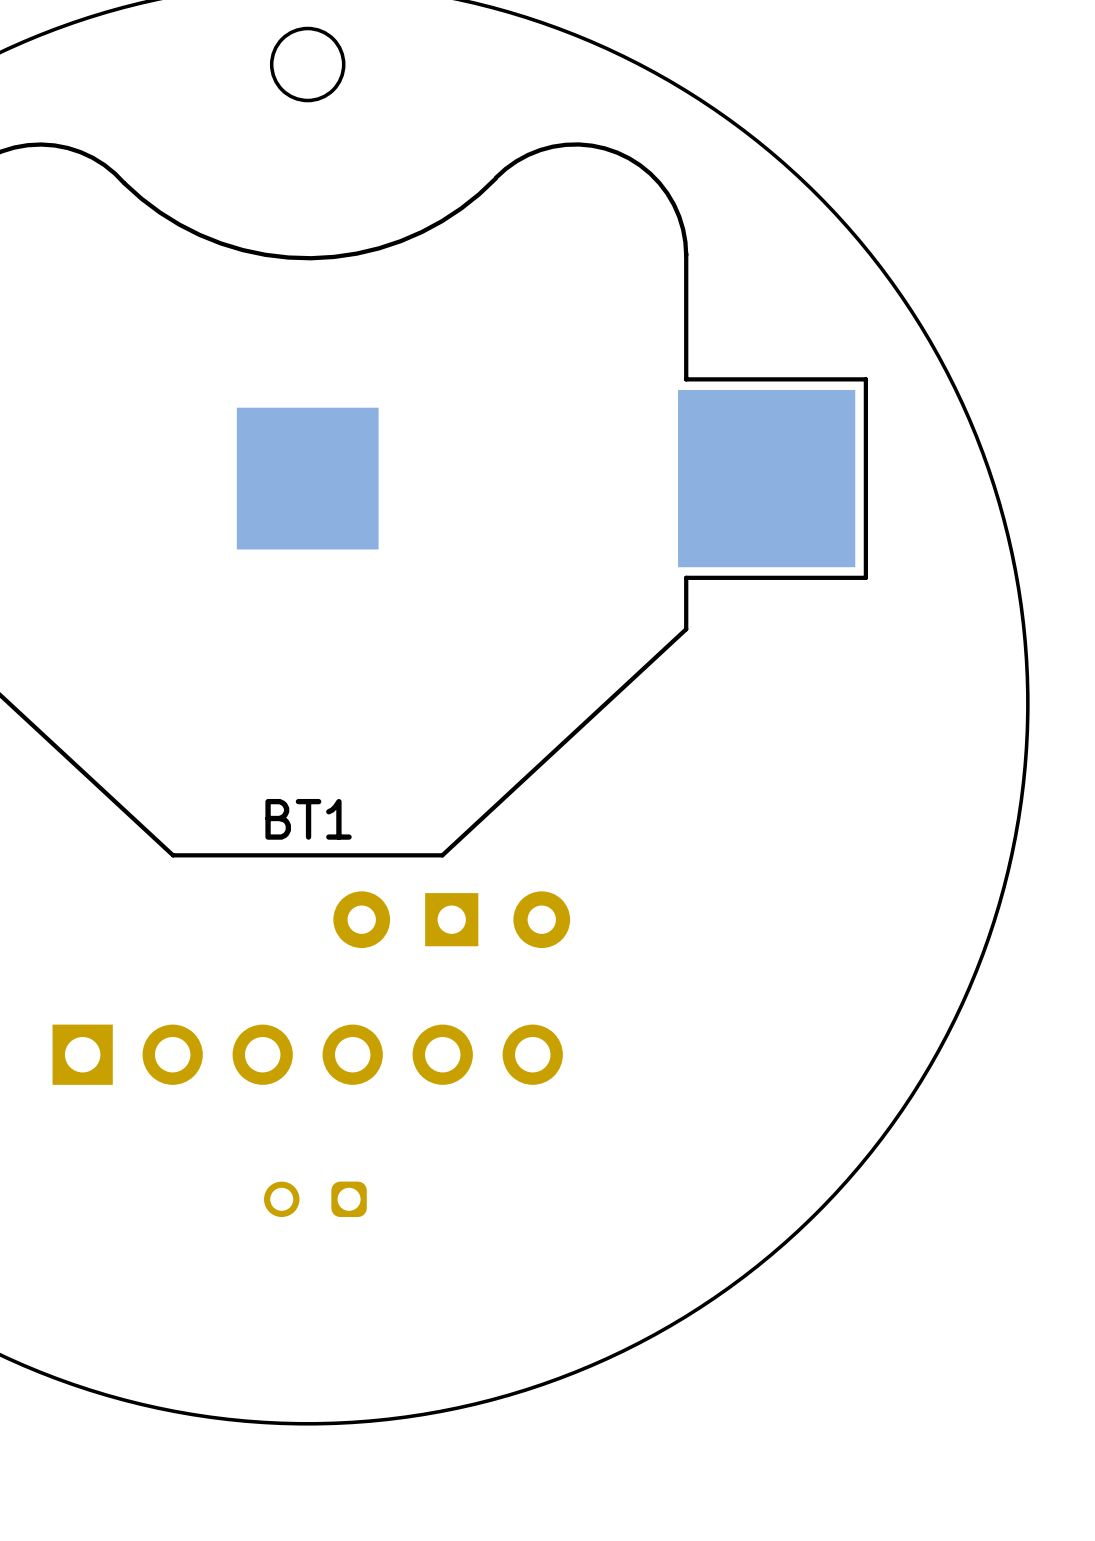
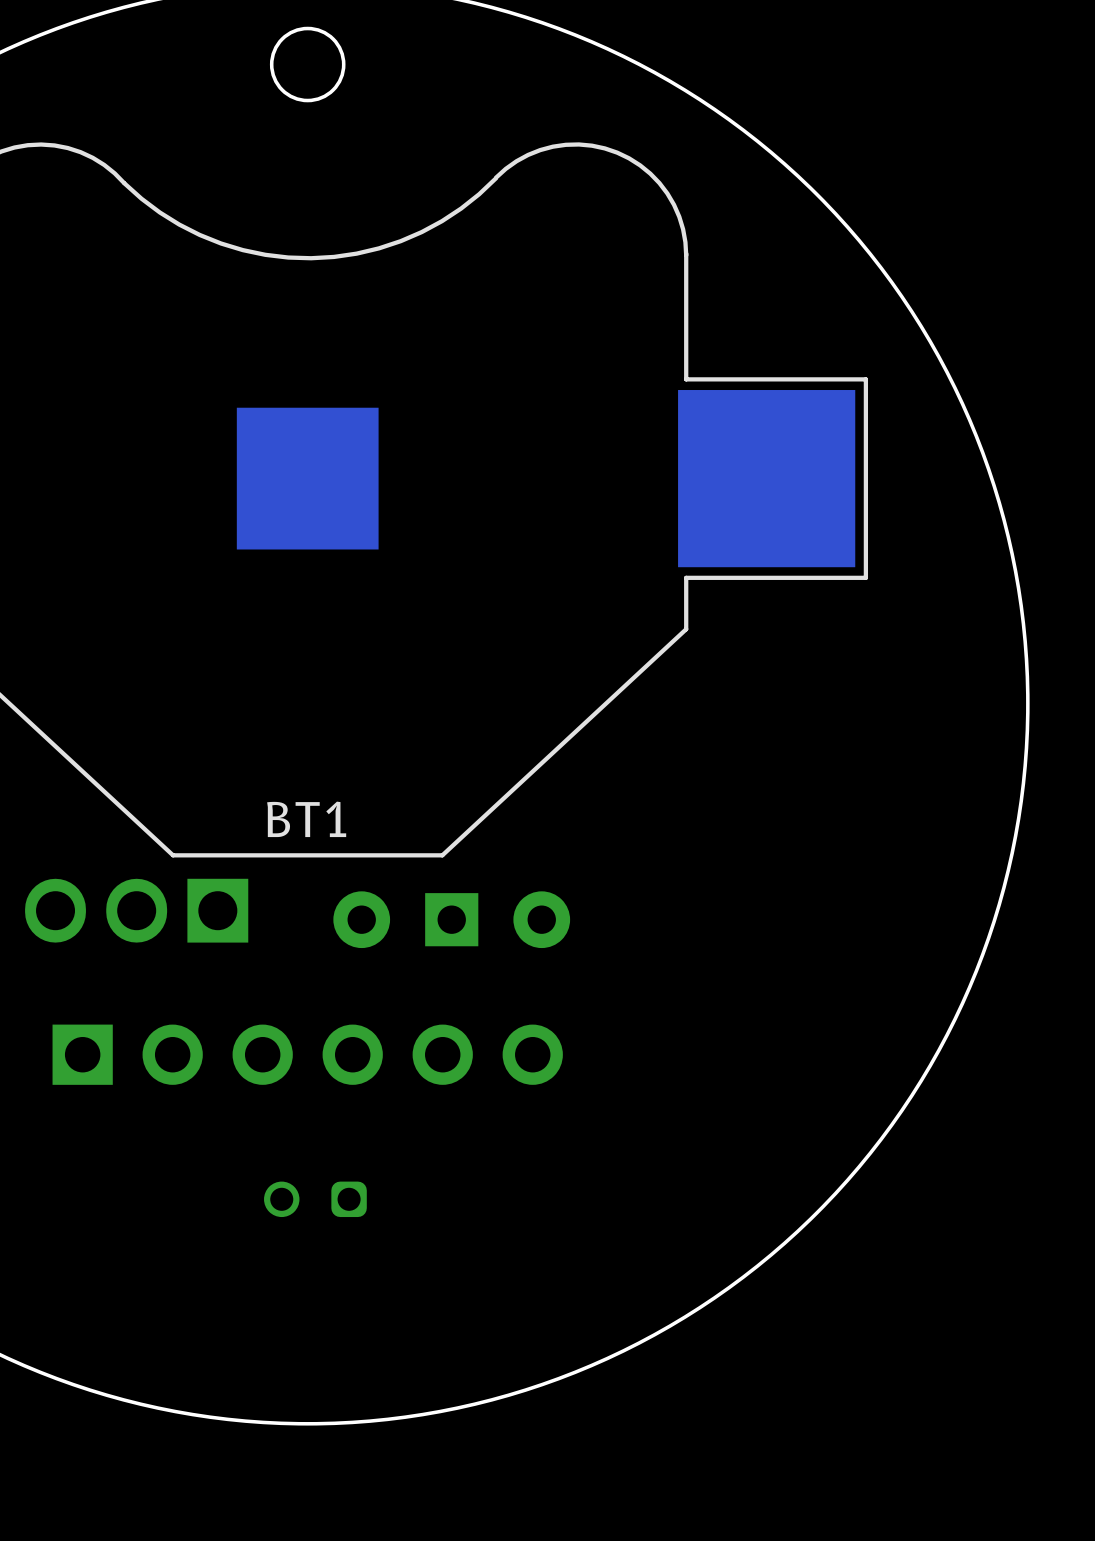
part: none -> (136, 910)

